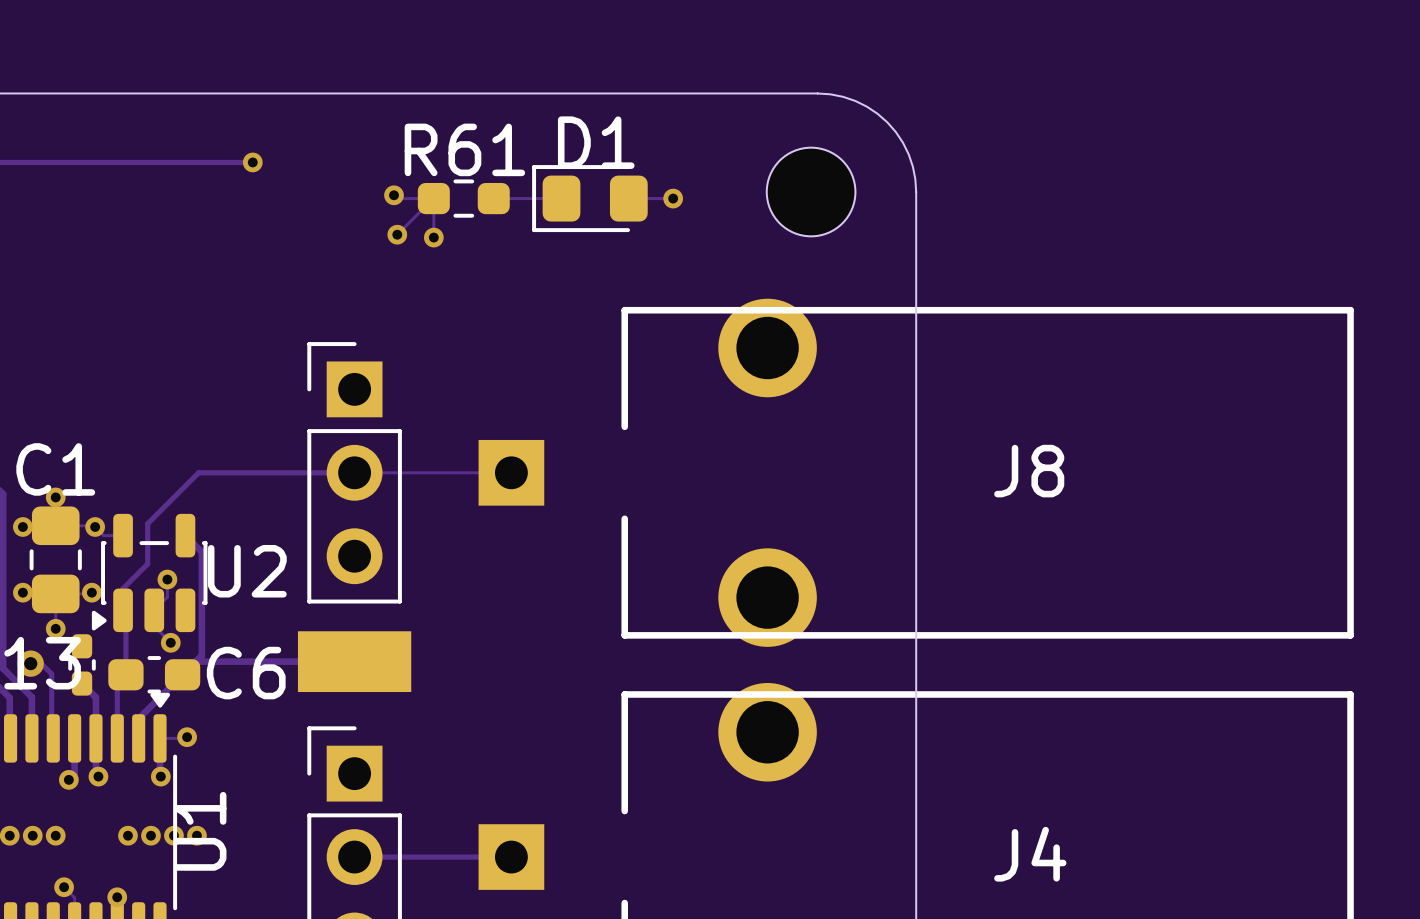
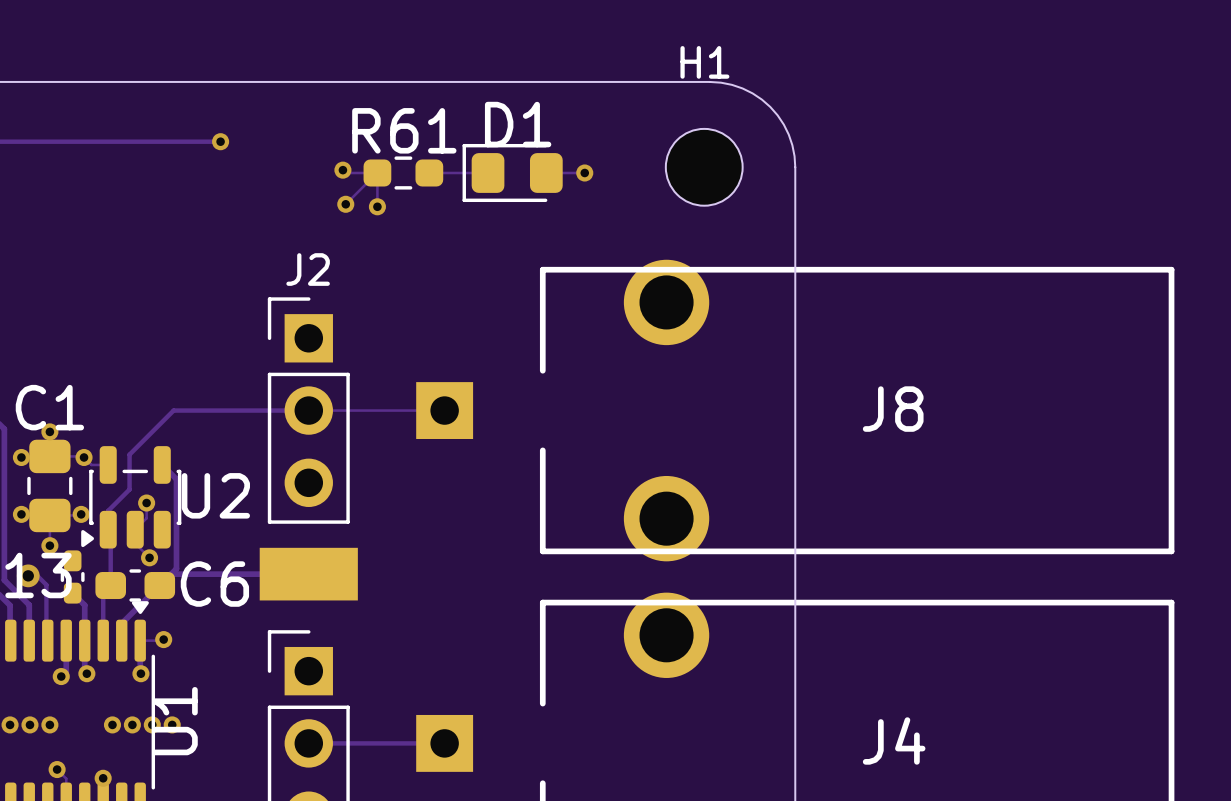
H1 name: none -> H1 (704, 62)
J2 name: none -> J2 (308, 269)

